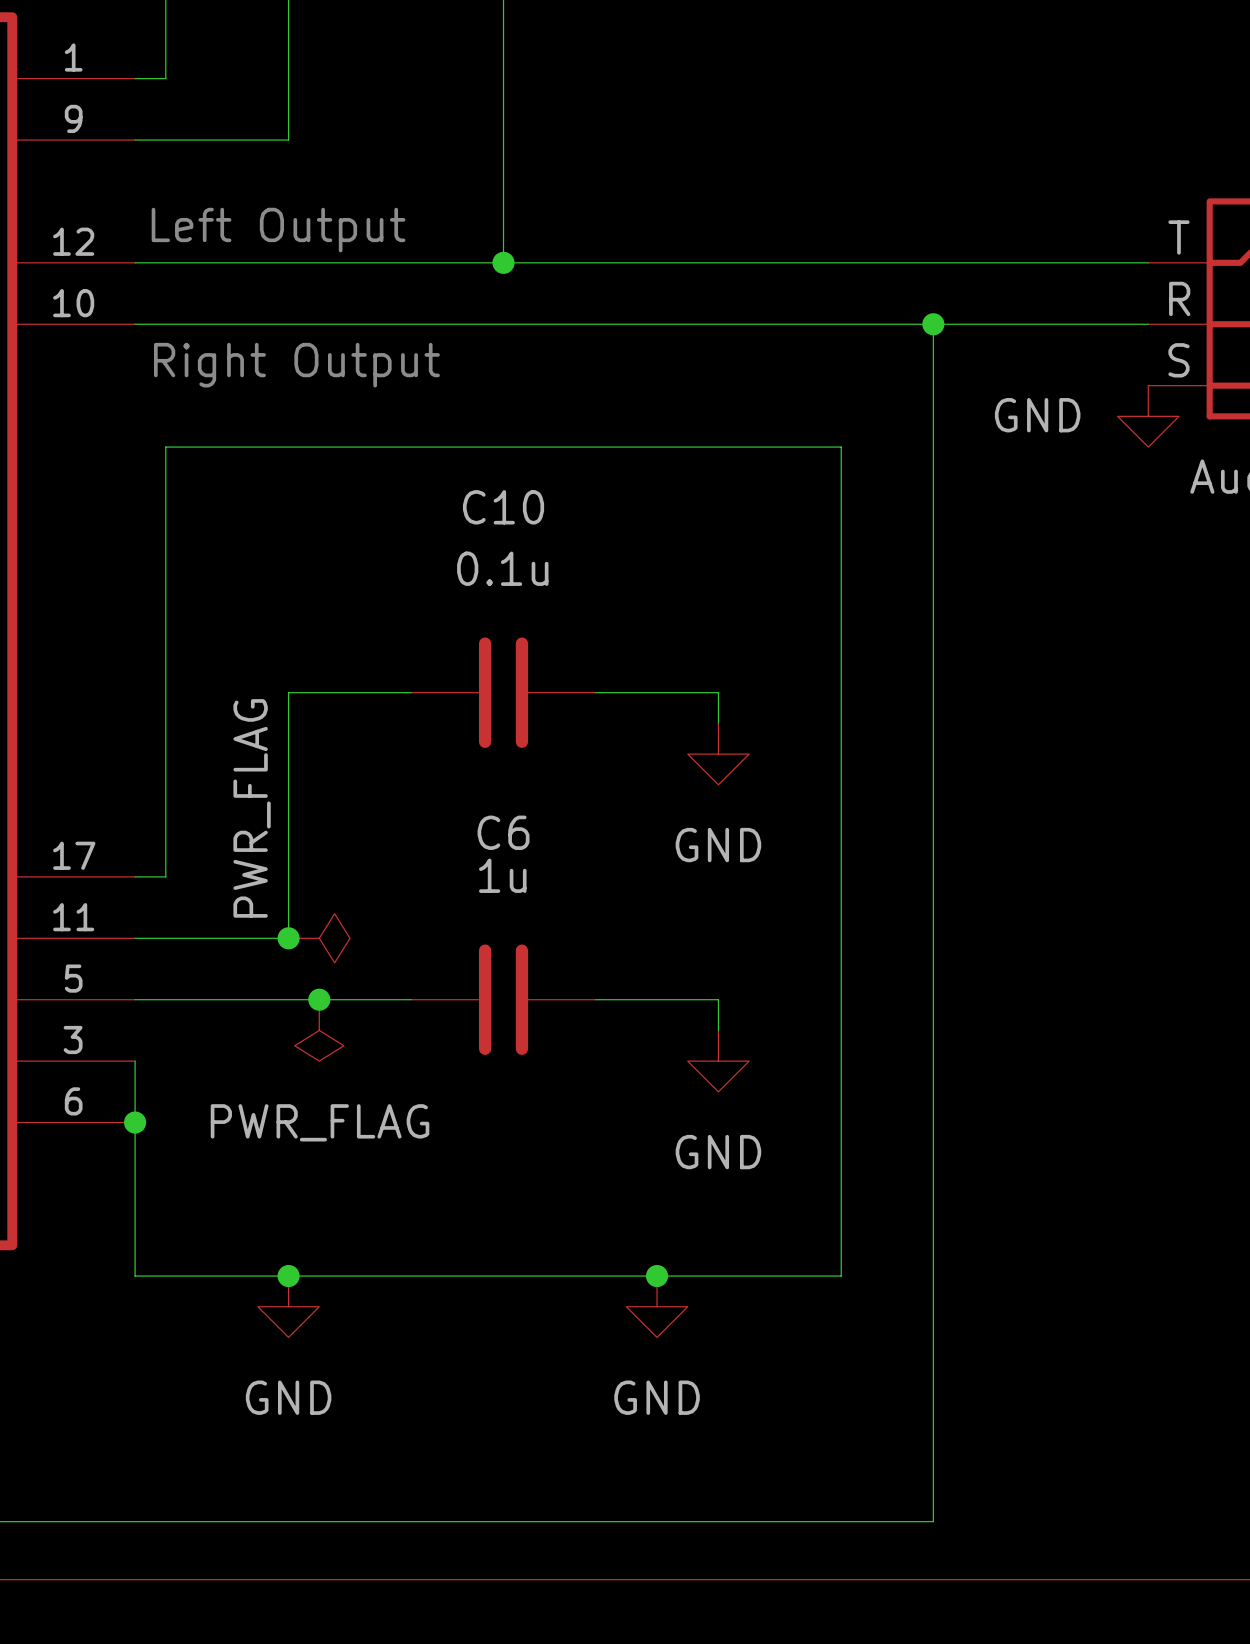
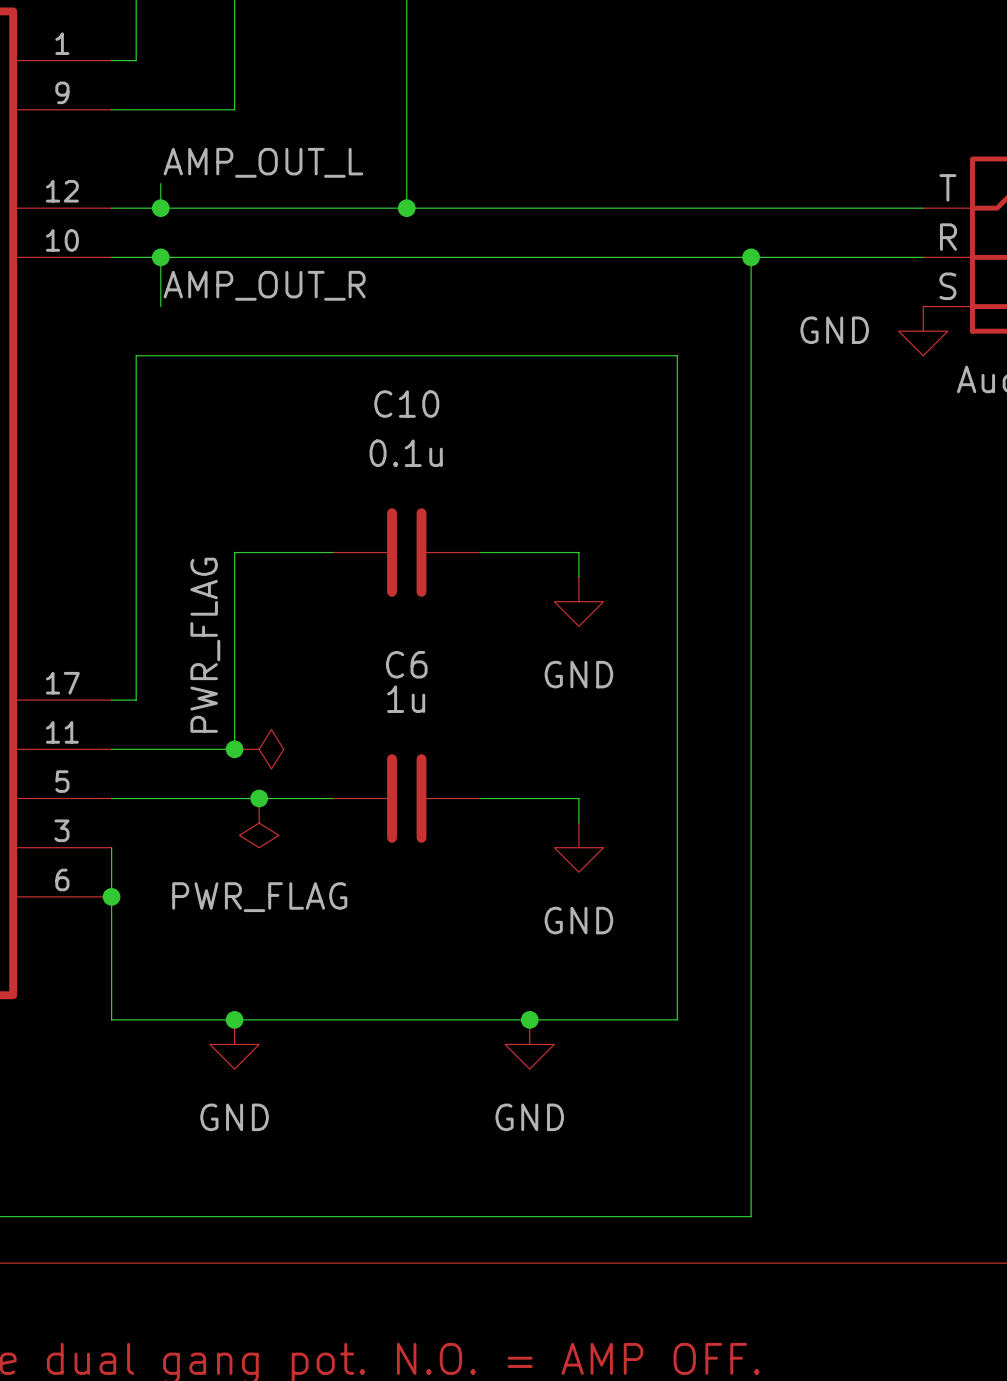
label: none -> AMP_OUT_L (263, 162)
text: Left Output (278, 230) -> none
wire: none -> (160, 183) (160, 208)
junction: none -> (160, 208)
wire: none -> (160, 257) (160, 306)
junction: none -> (160, 257)
label: none -> AMP_OUT_R (264, 285)
text: Right Output (296, 365) -> none

